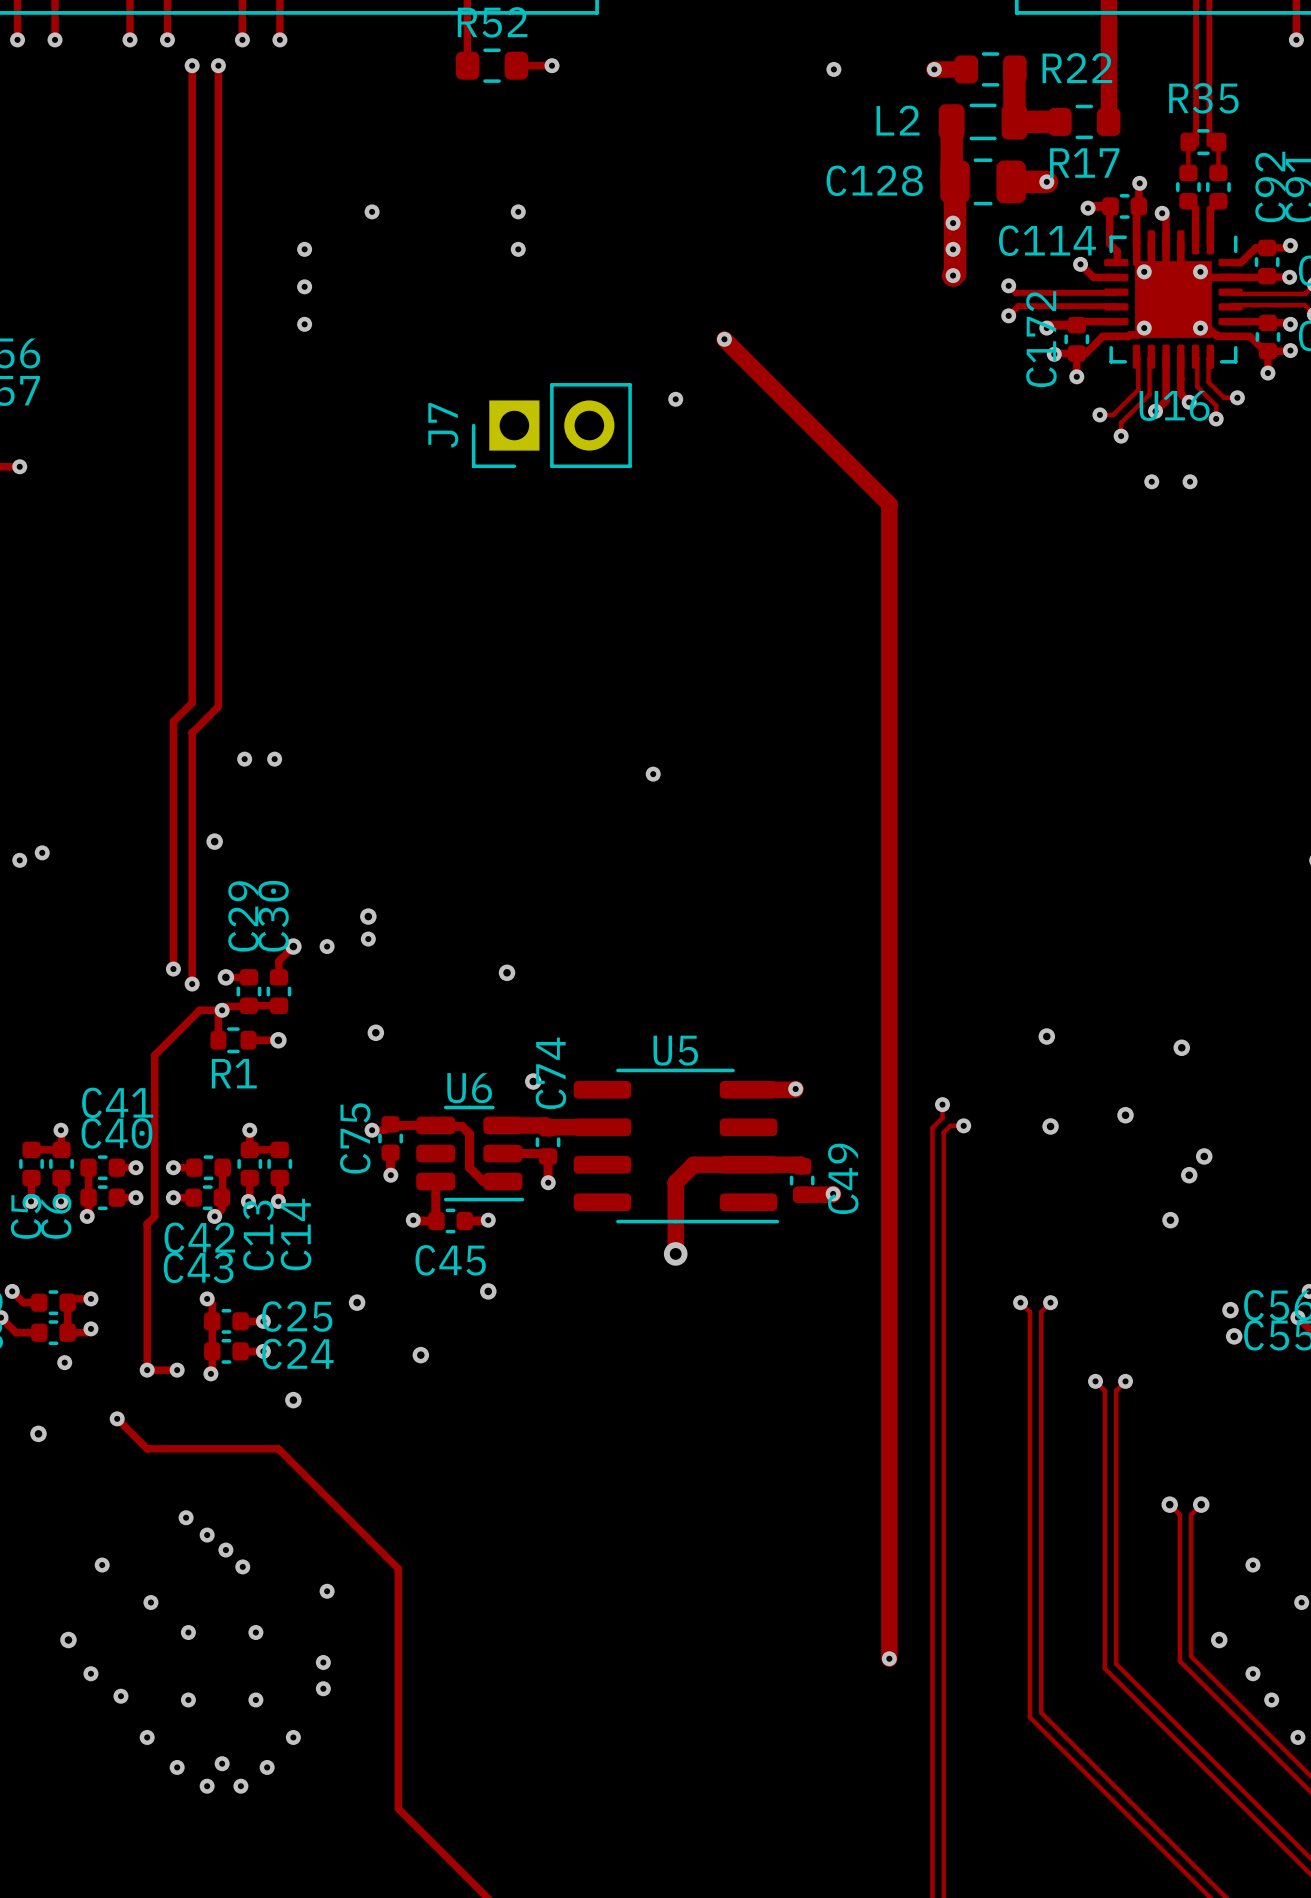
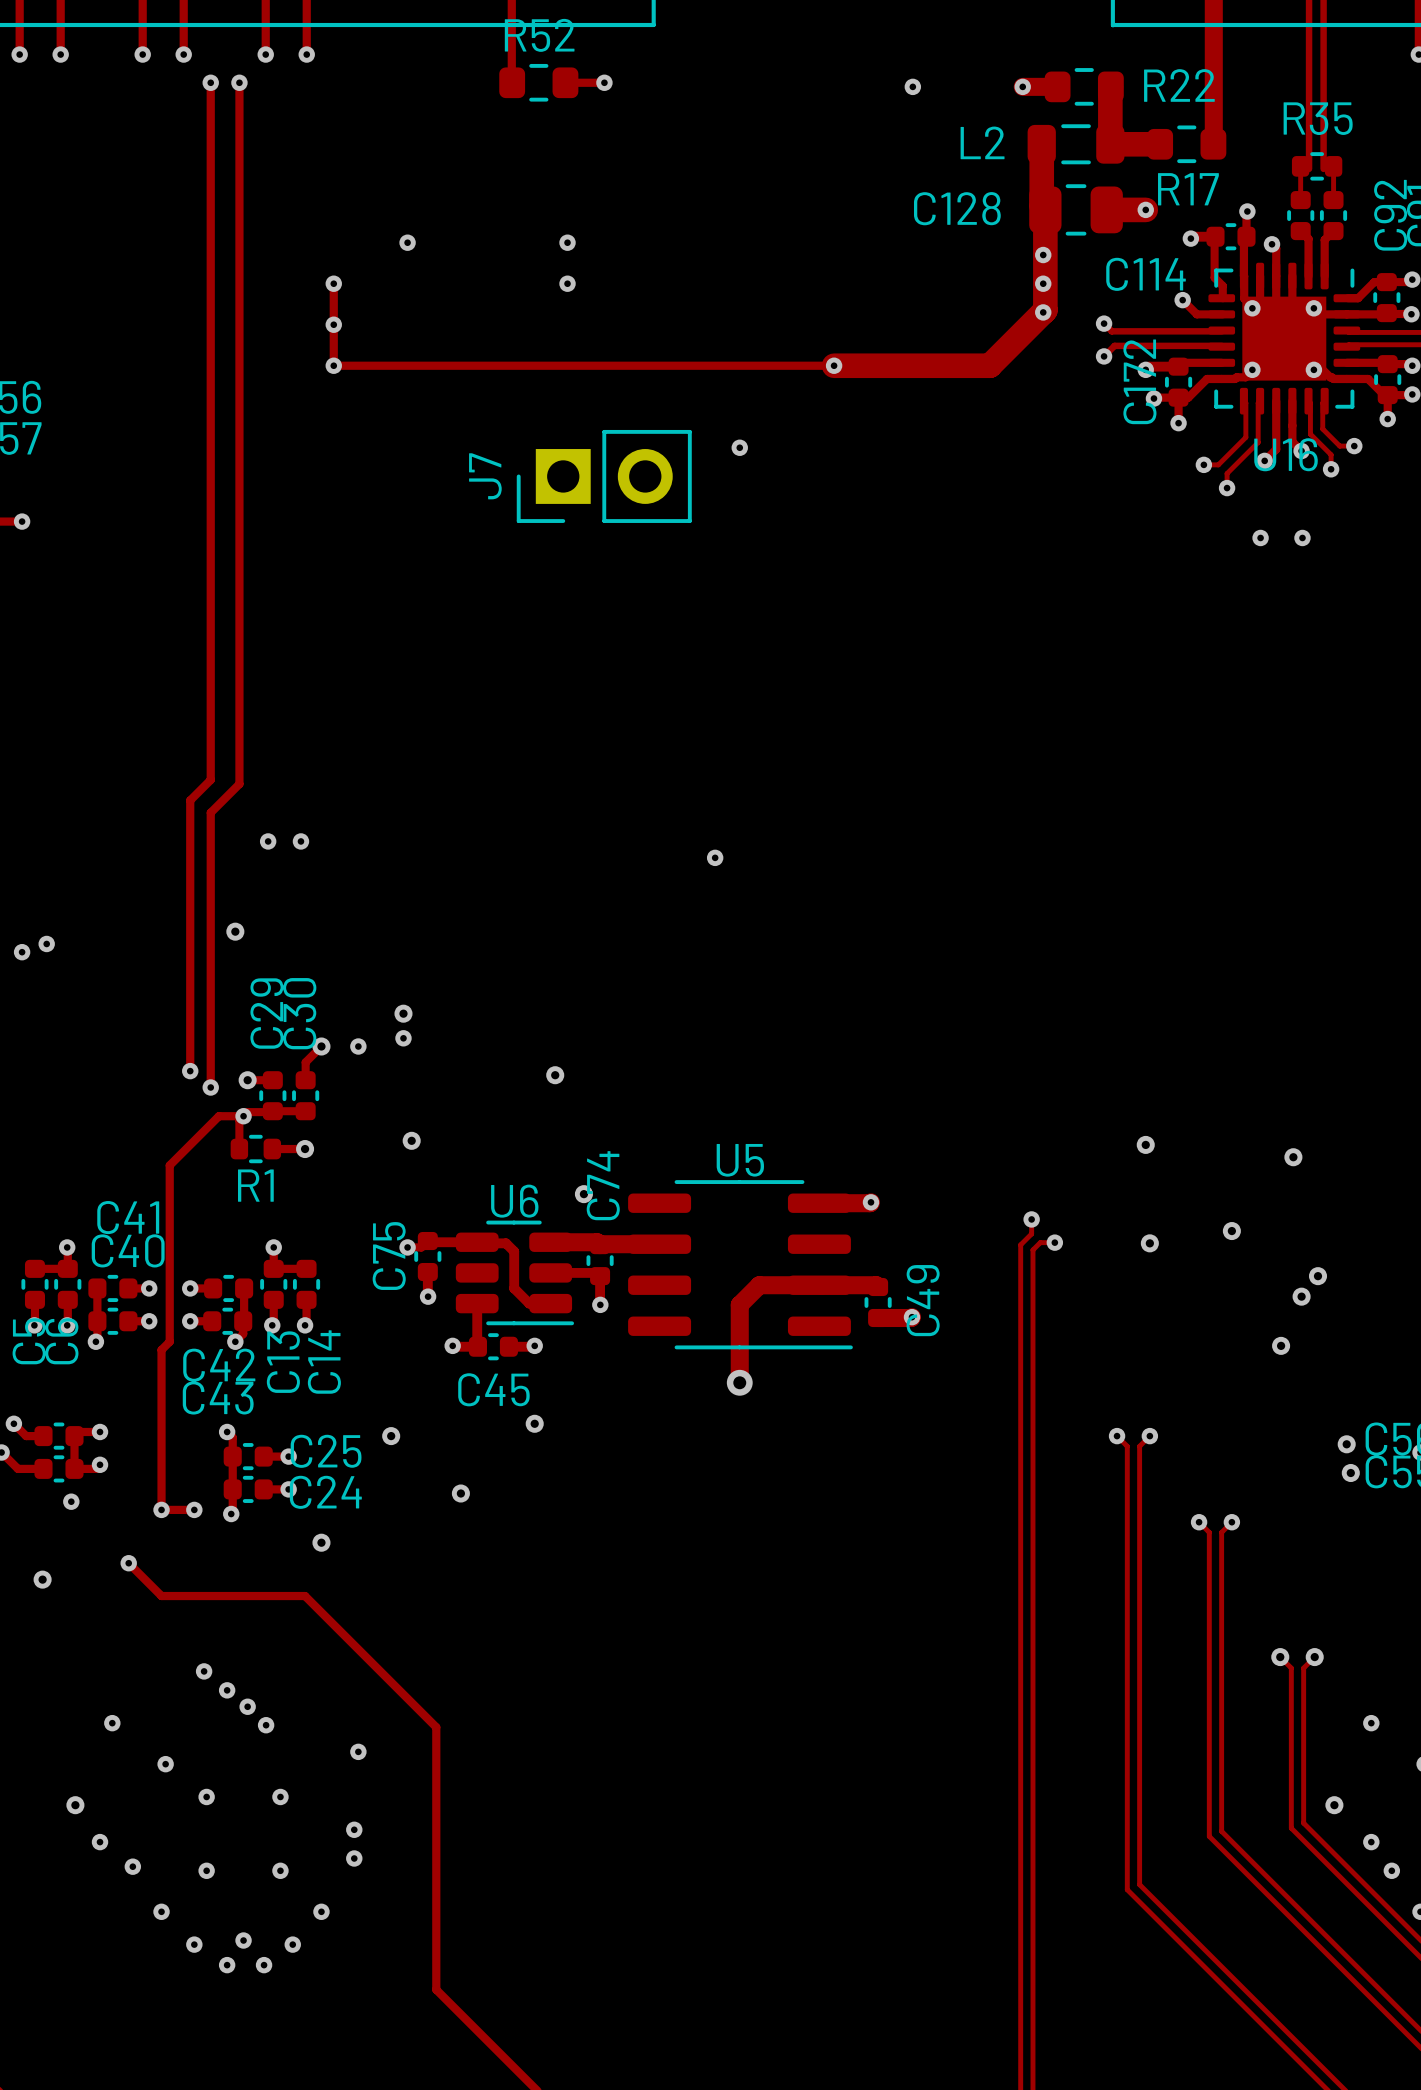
track: none -> (333, 283) (333, 365) (989, 365) (1043, 312)
track: (724, 339) (889, 504) (889, 1658) -> none
via position: (724, 339) -> (834, 365)
via: (889, 1658) -> none

